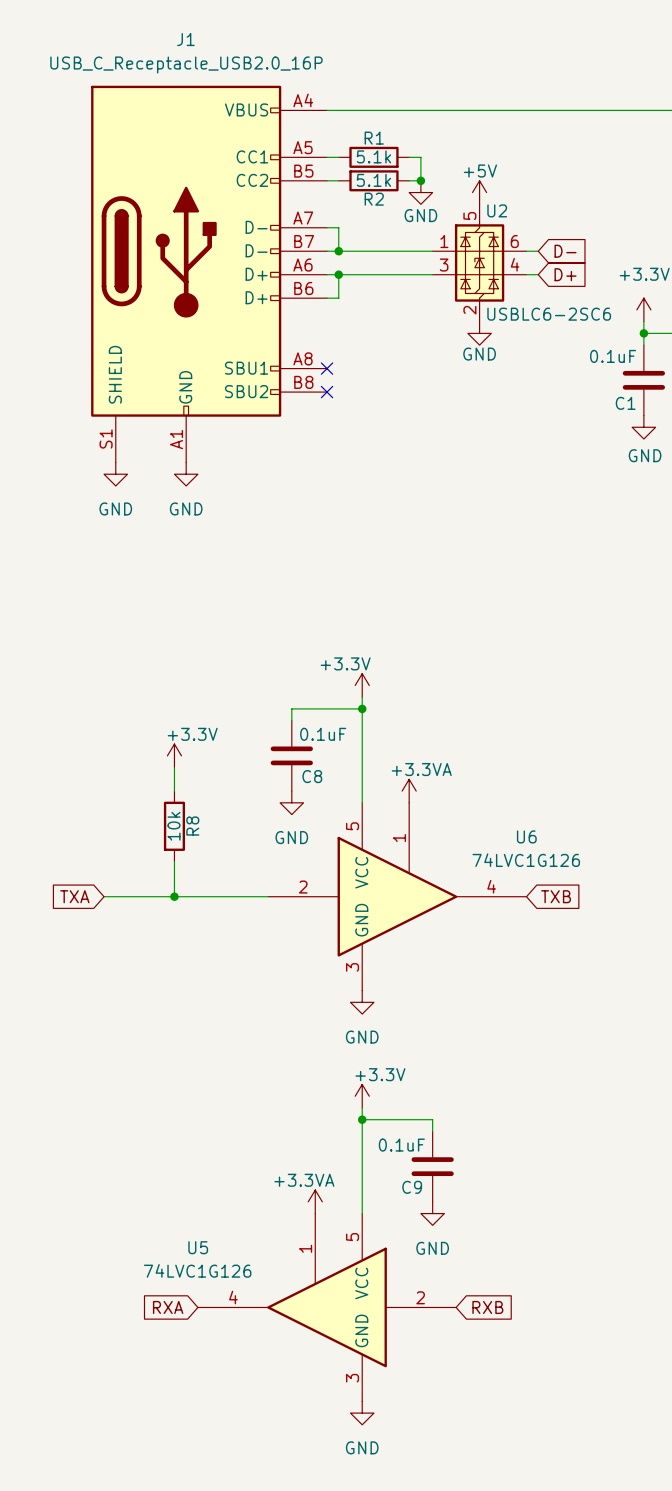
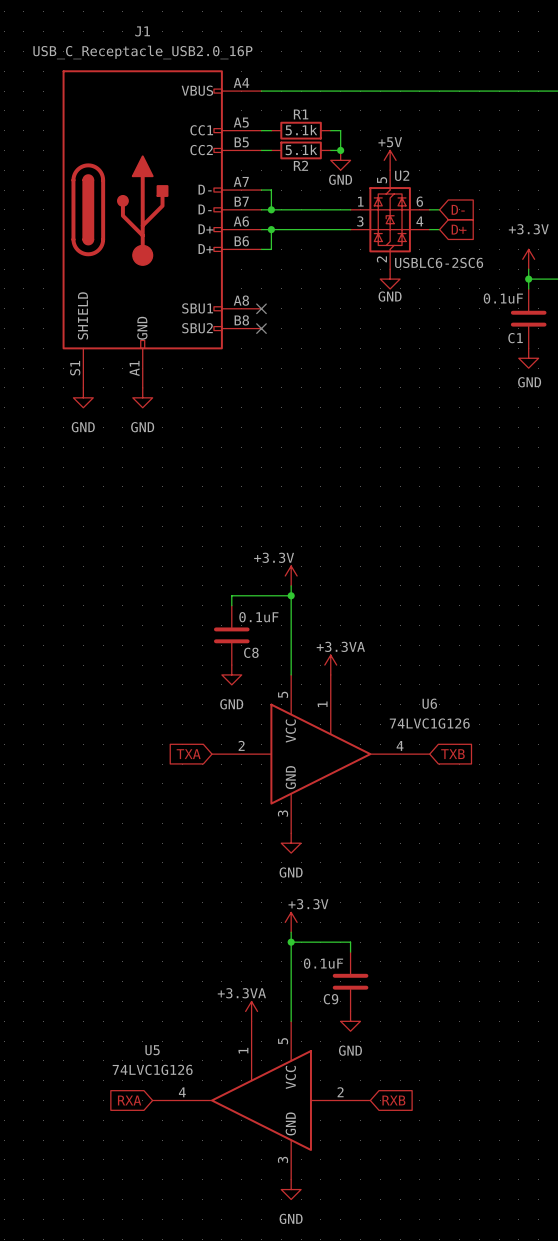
power symbol: +3.3V (174, 755) -> none
wire: (174, 767) (174, 791) -> none
R8: 10k (174, 826) -> none
wire: (174, 861) (174, 896) -> none
global label position: TXA (74, 896) -> TXA (188, 754)
wire: (104, 896) (268, 896) -> none
junction: (174, 896) -> none

